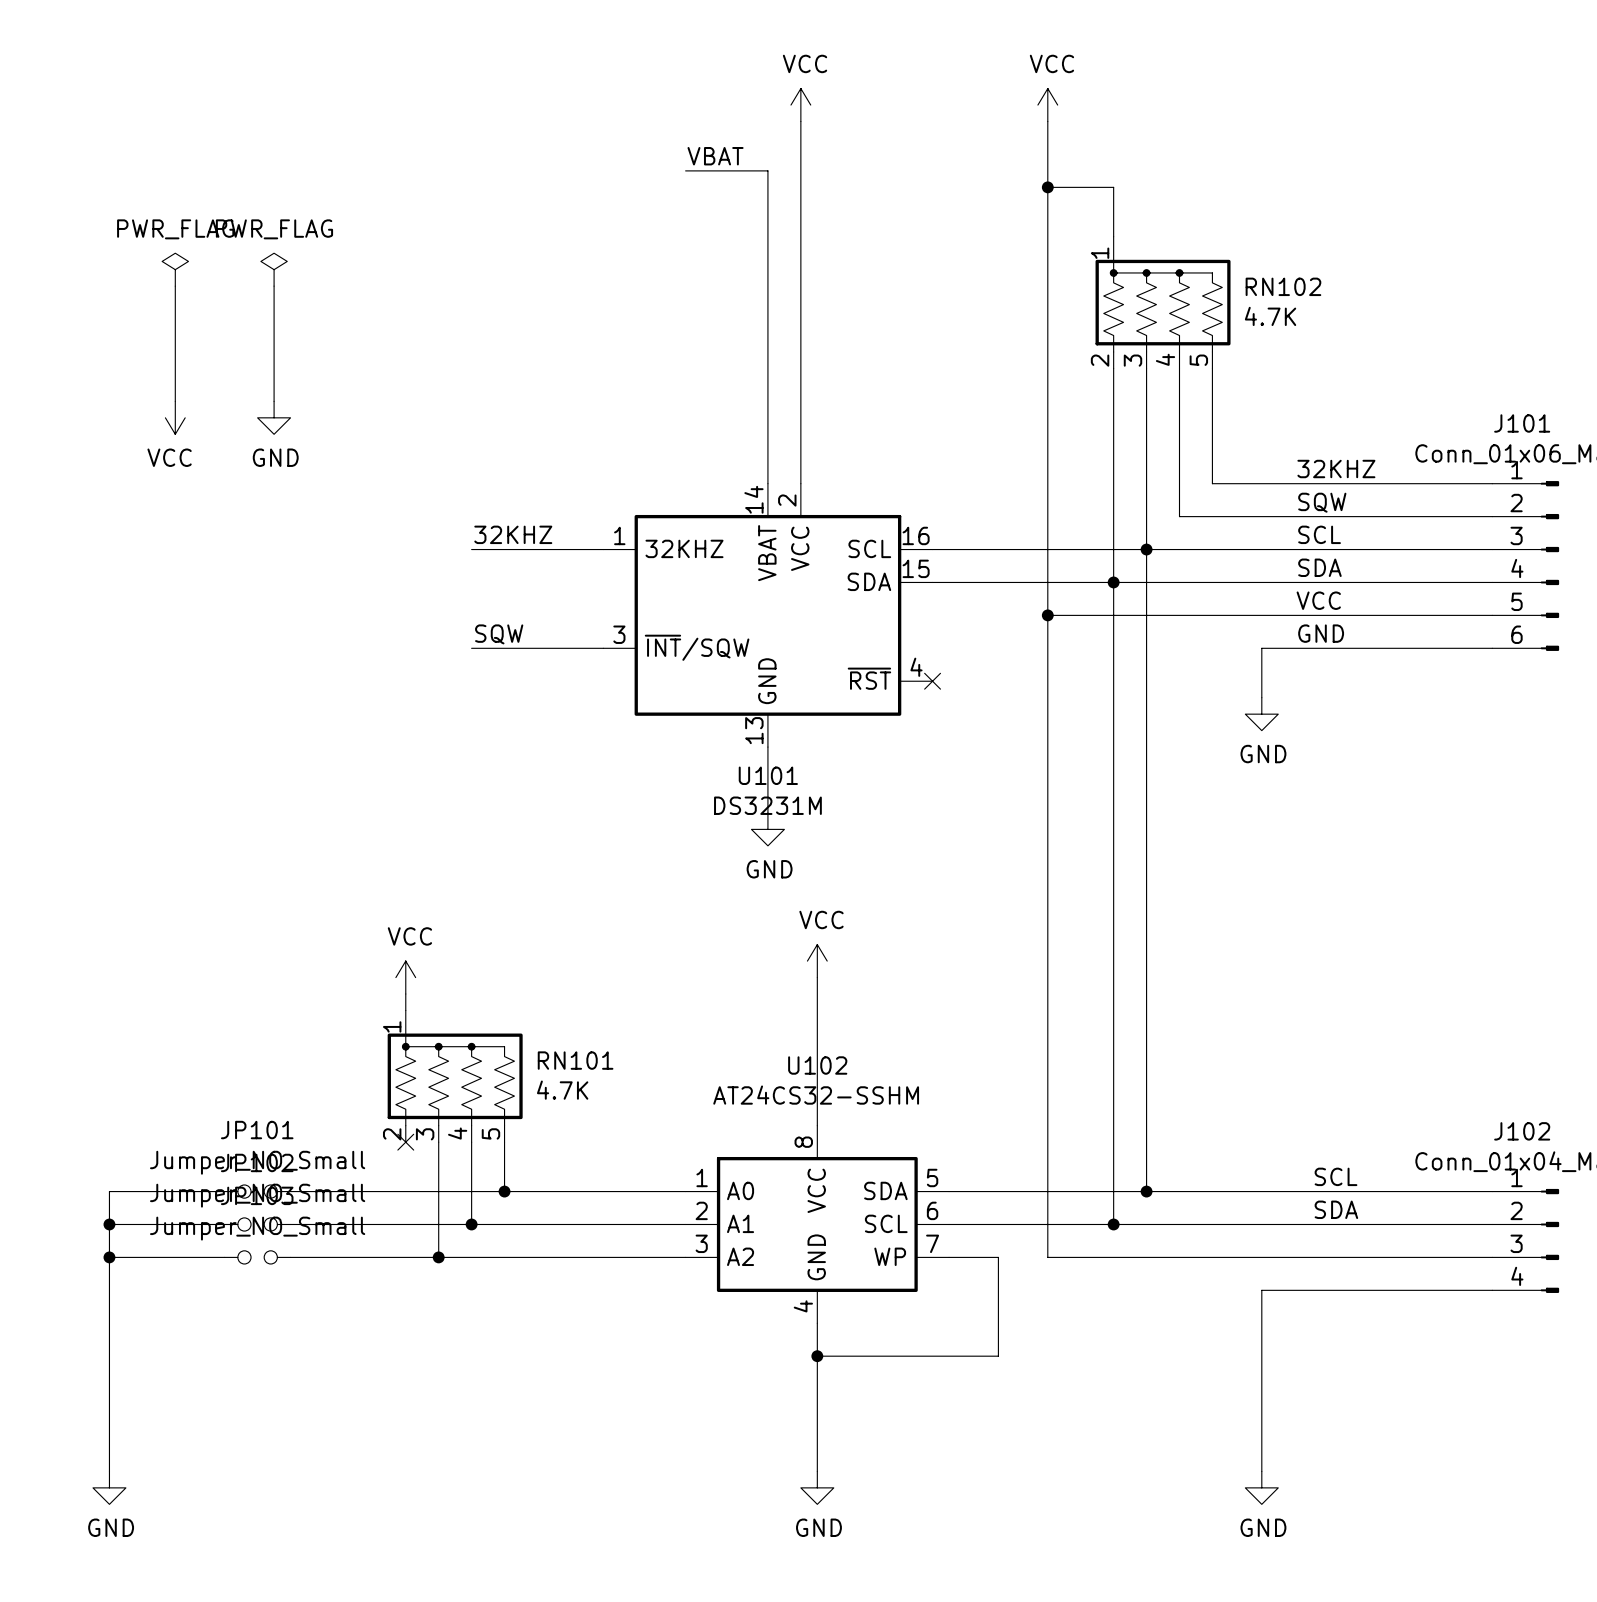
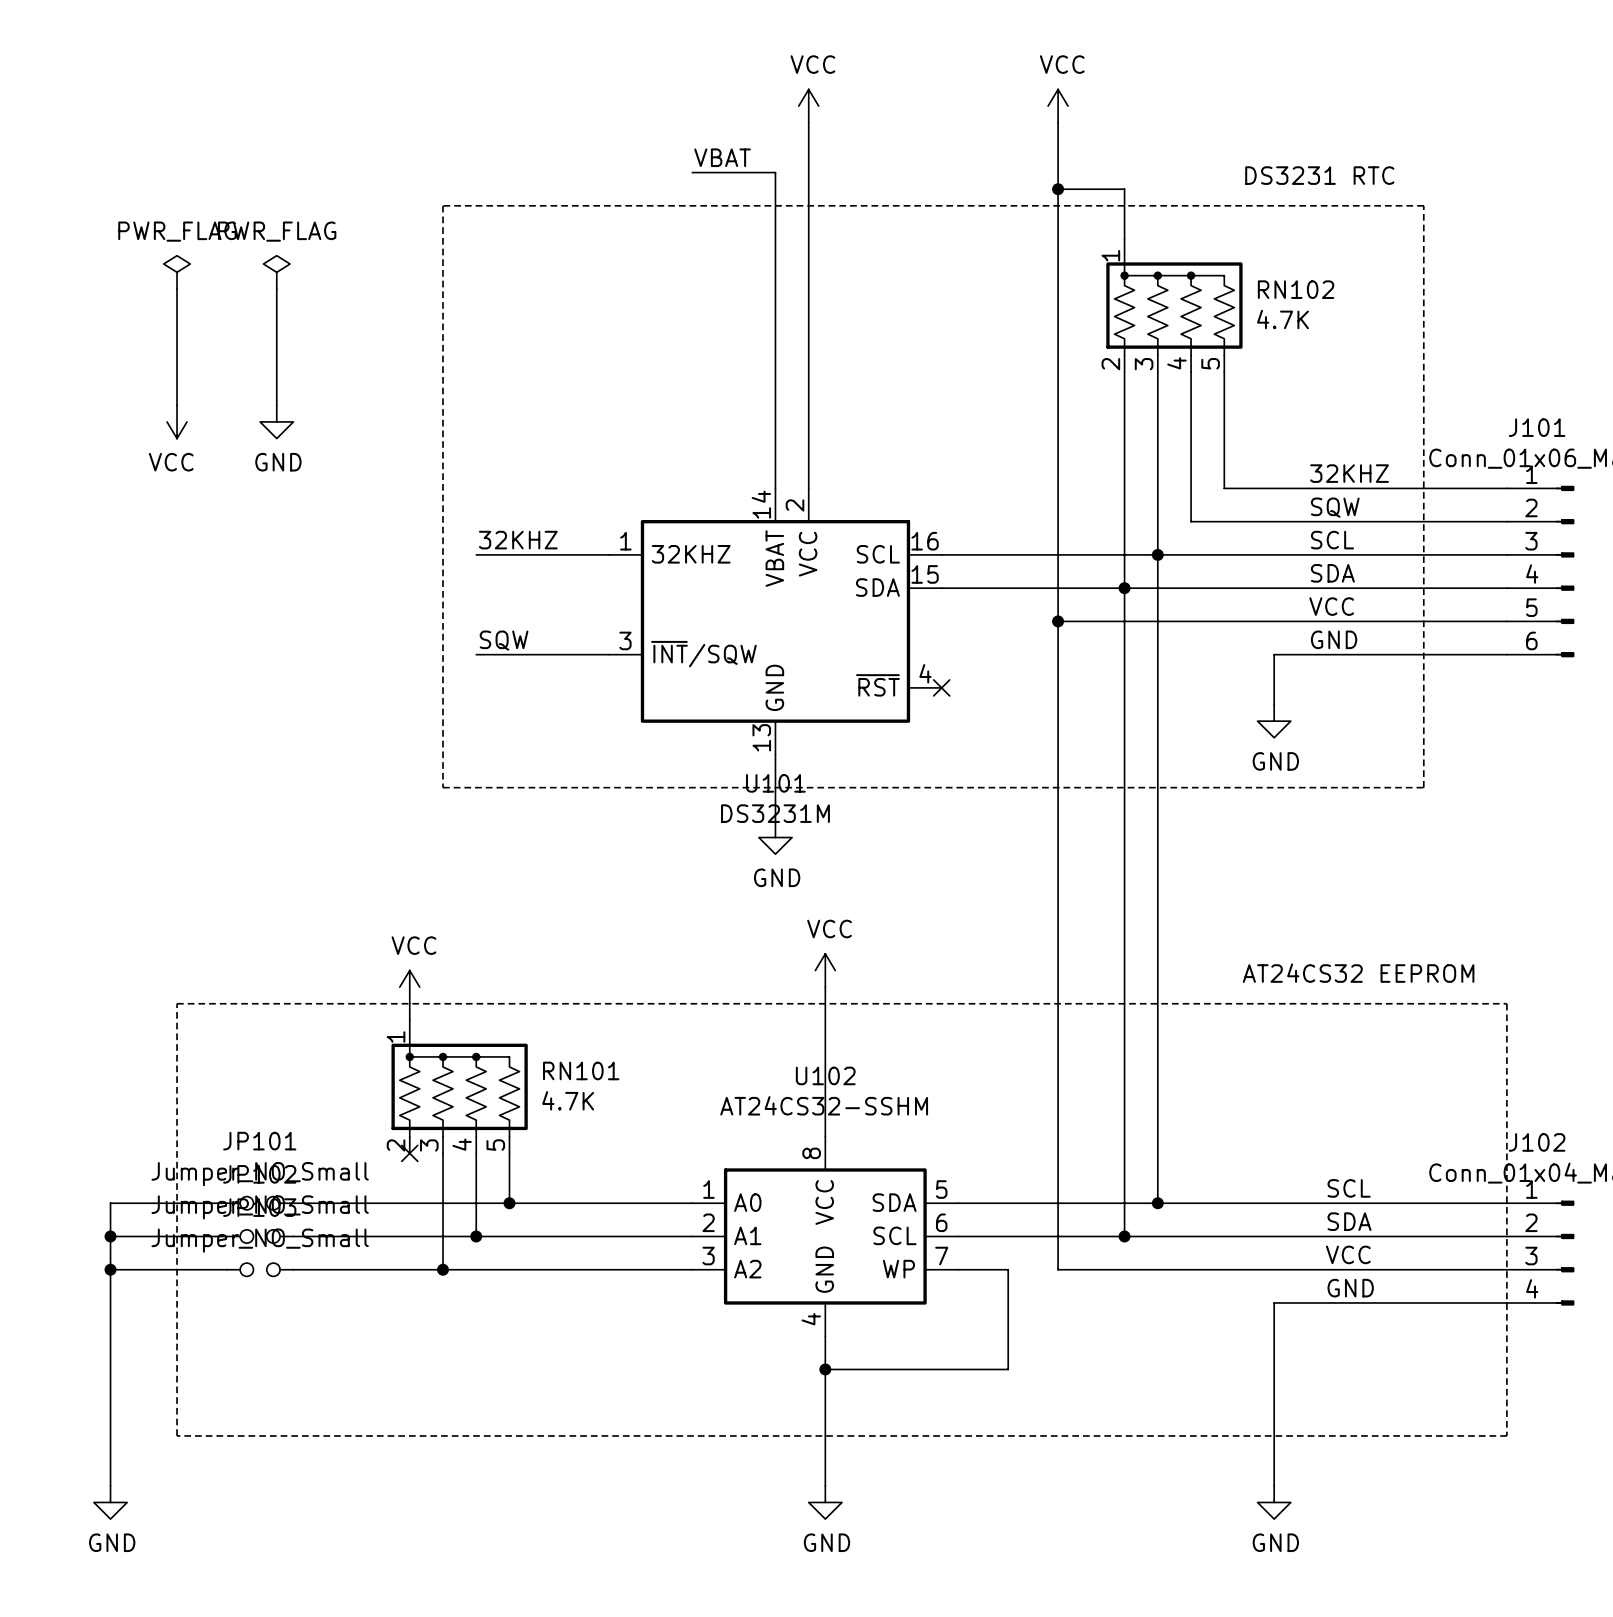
text: none -> DS3231 RTC (1319, 175)
line: none -> (443, 205) (1423, 205) (1423, 787) (443, 787) (443, 205)
text: none -> AT24CS32 EEPROM (1358, 973)
line: none -> (177, 1003) (1506, 1003) (1506, 1435) (177, 1435) (177, 1003)
label: none -> VCC (1348, 1254)
label: none -> GND (1350, 1288)

